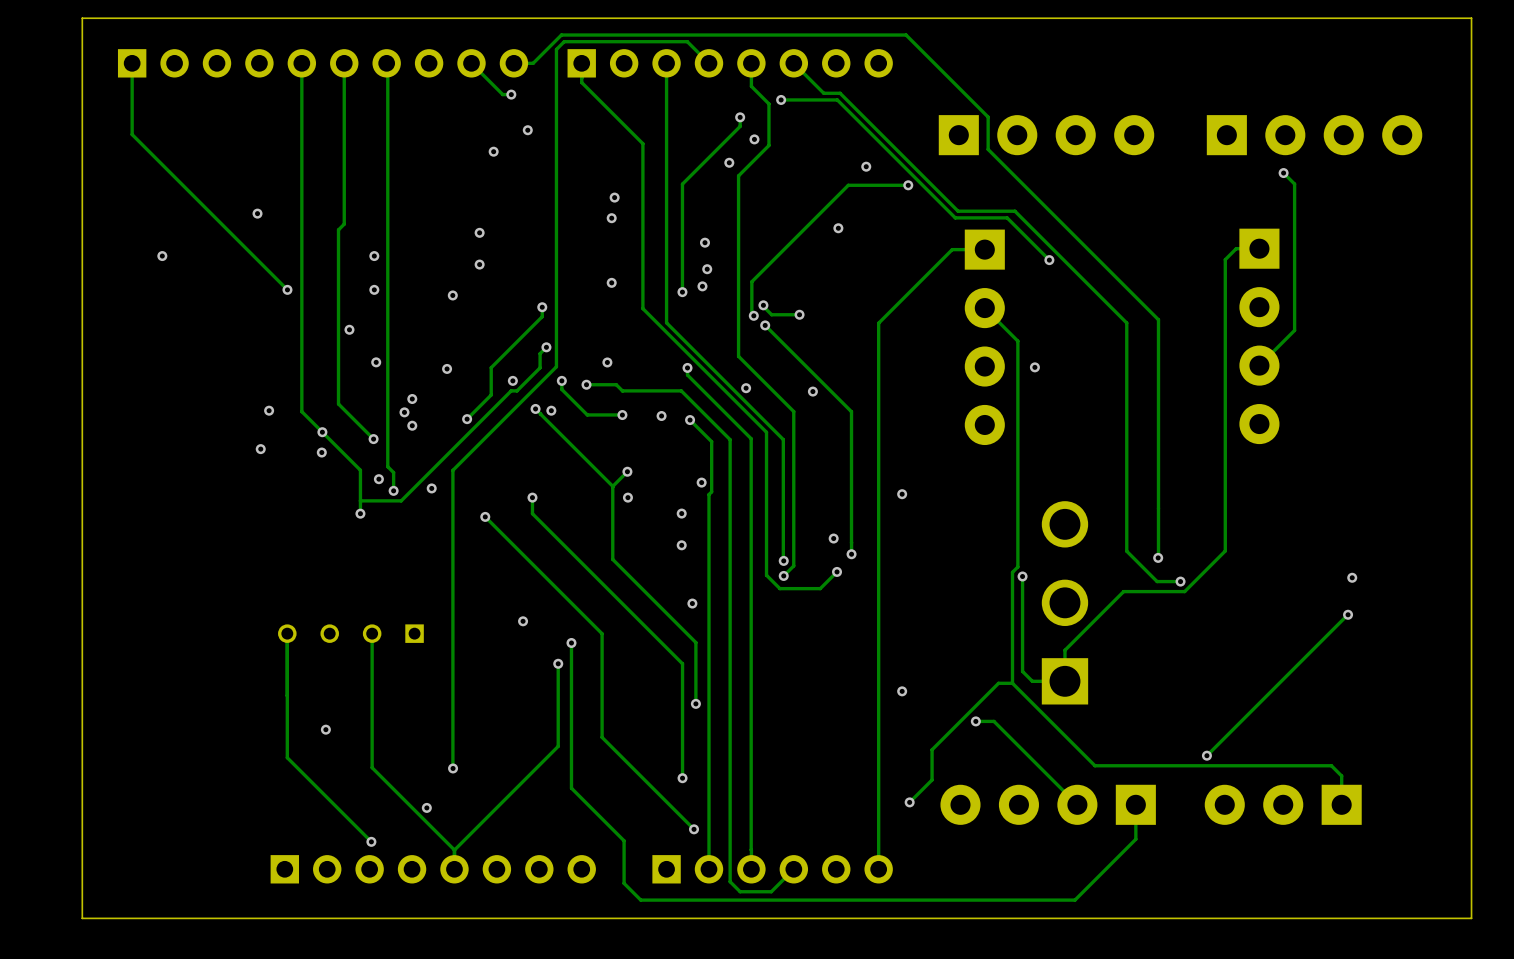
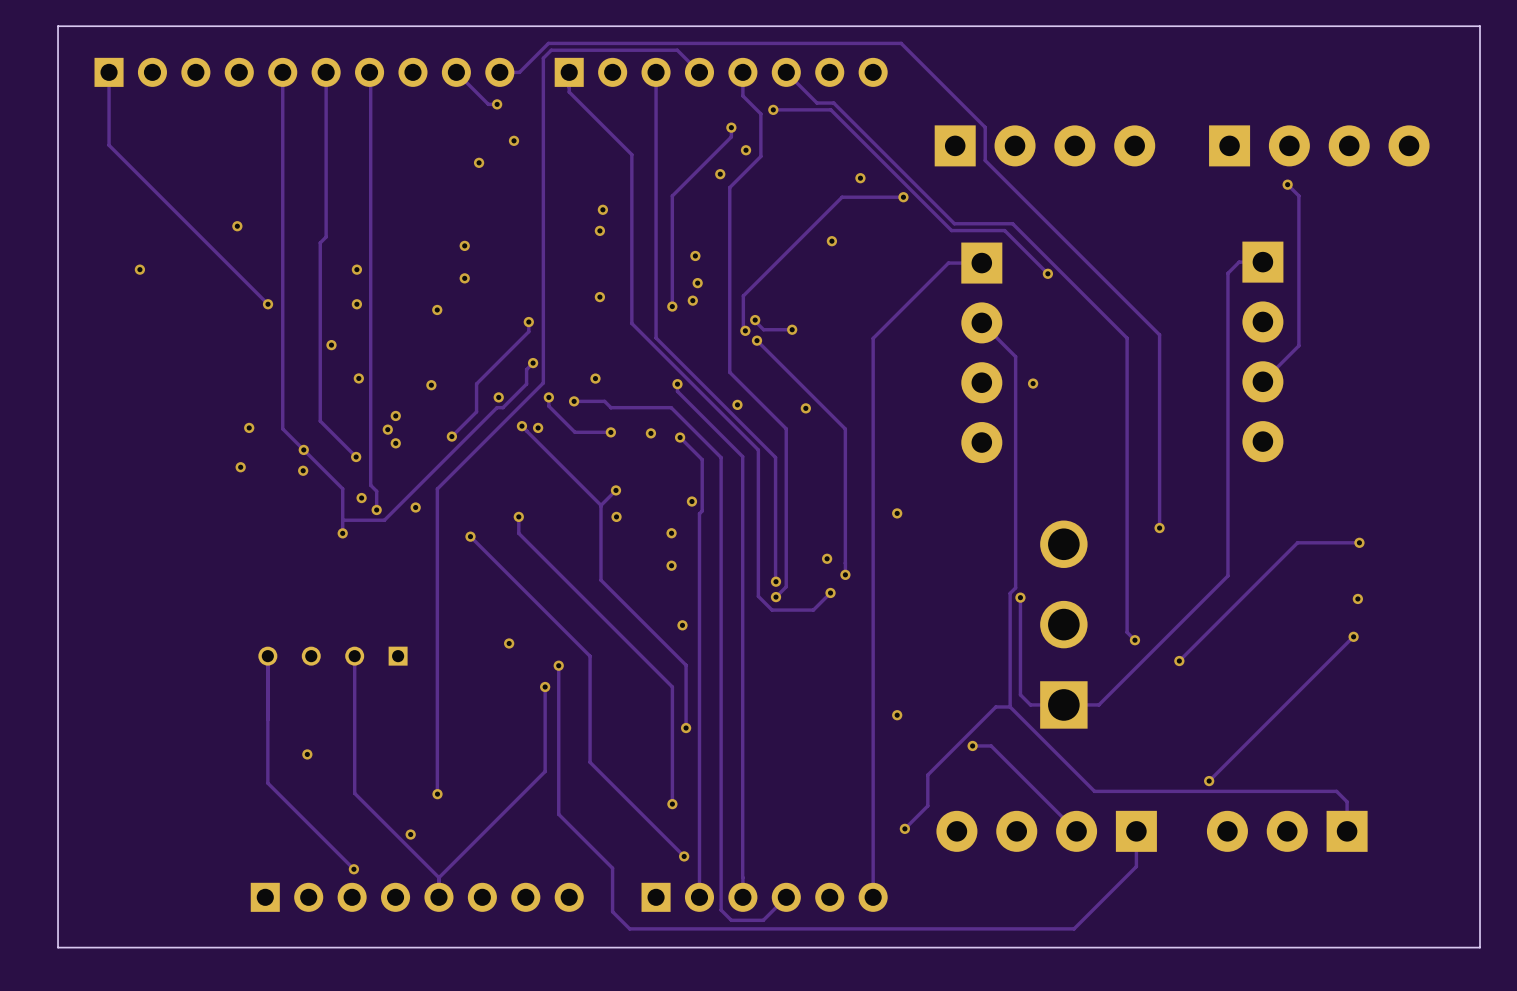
track: (1158, 508) (1158, 557) -> none
via: none -> (1159, 528)
track: none -> (1359, 542) (1297, 542) (1179, 661)
via: none -> (1359, 542)
track: (1225, 550) (1184, 591) (1123, 591) (1064, 650) (1064, 681) -> (1227, 571) (1227, 575) (1098, 704) (1063, 704)
track: (1126, 551) (1157, 581) (1180, 581) -> (1127, 571) (1127, 632) (1134, 640)
via: (1158, 557) -> none
via: (1180, 581) -> none
via: none -> (1134, 640)
via: none -> (1179, 661)

